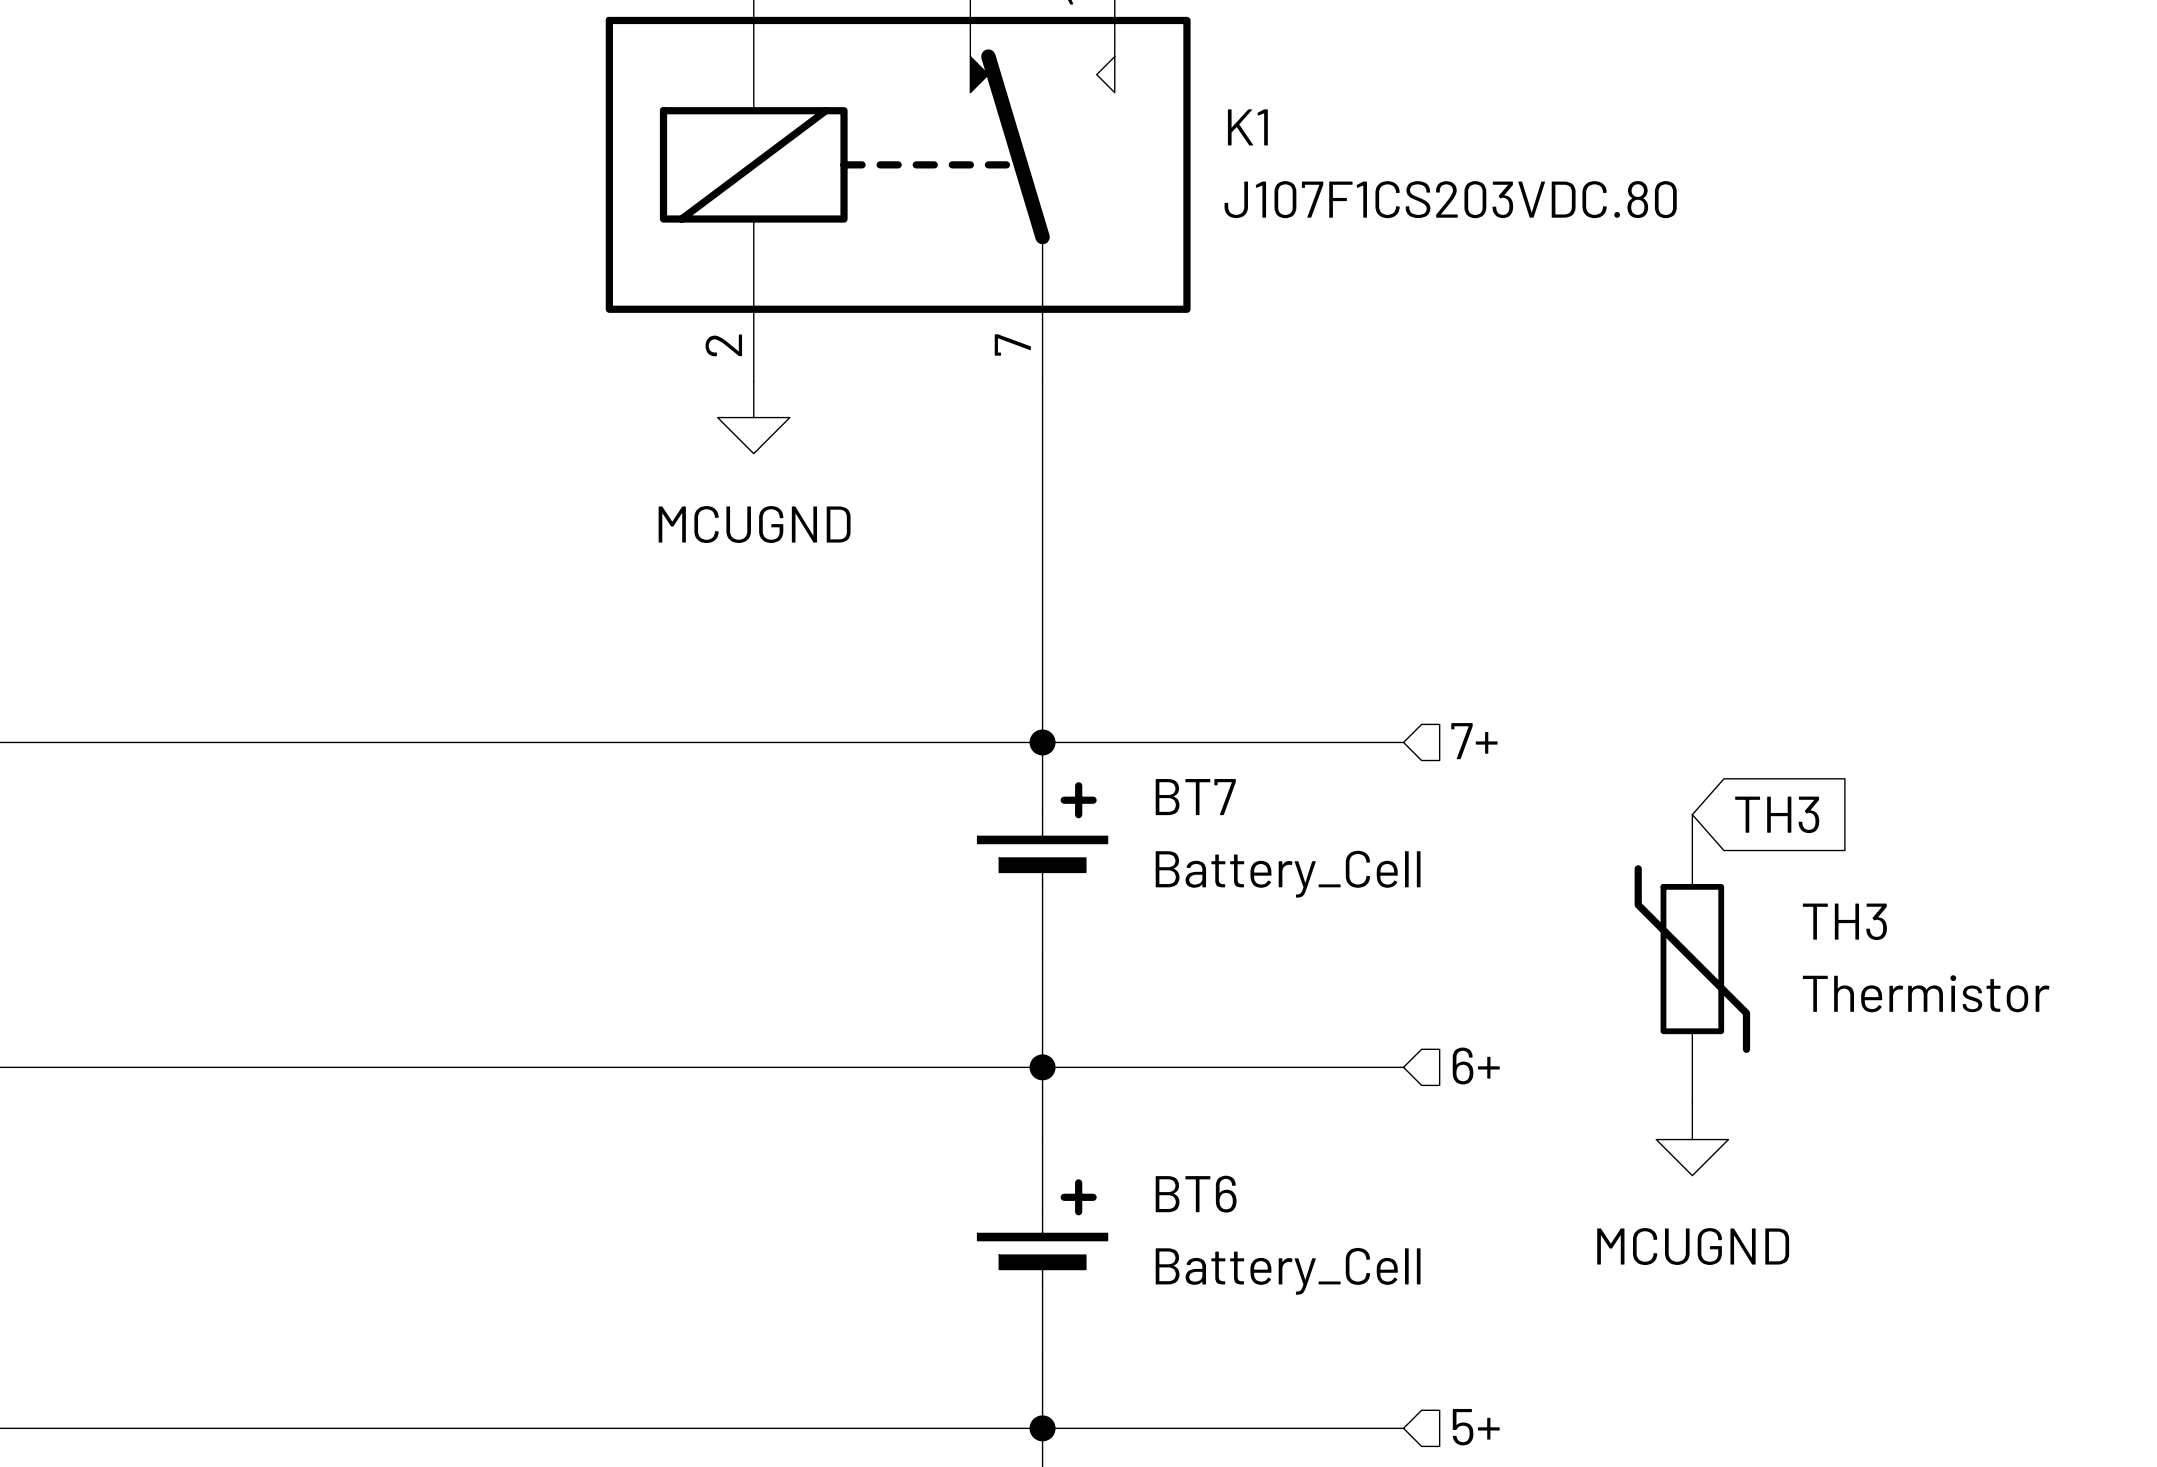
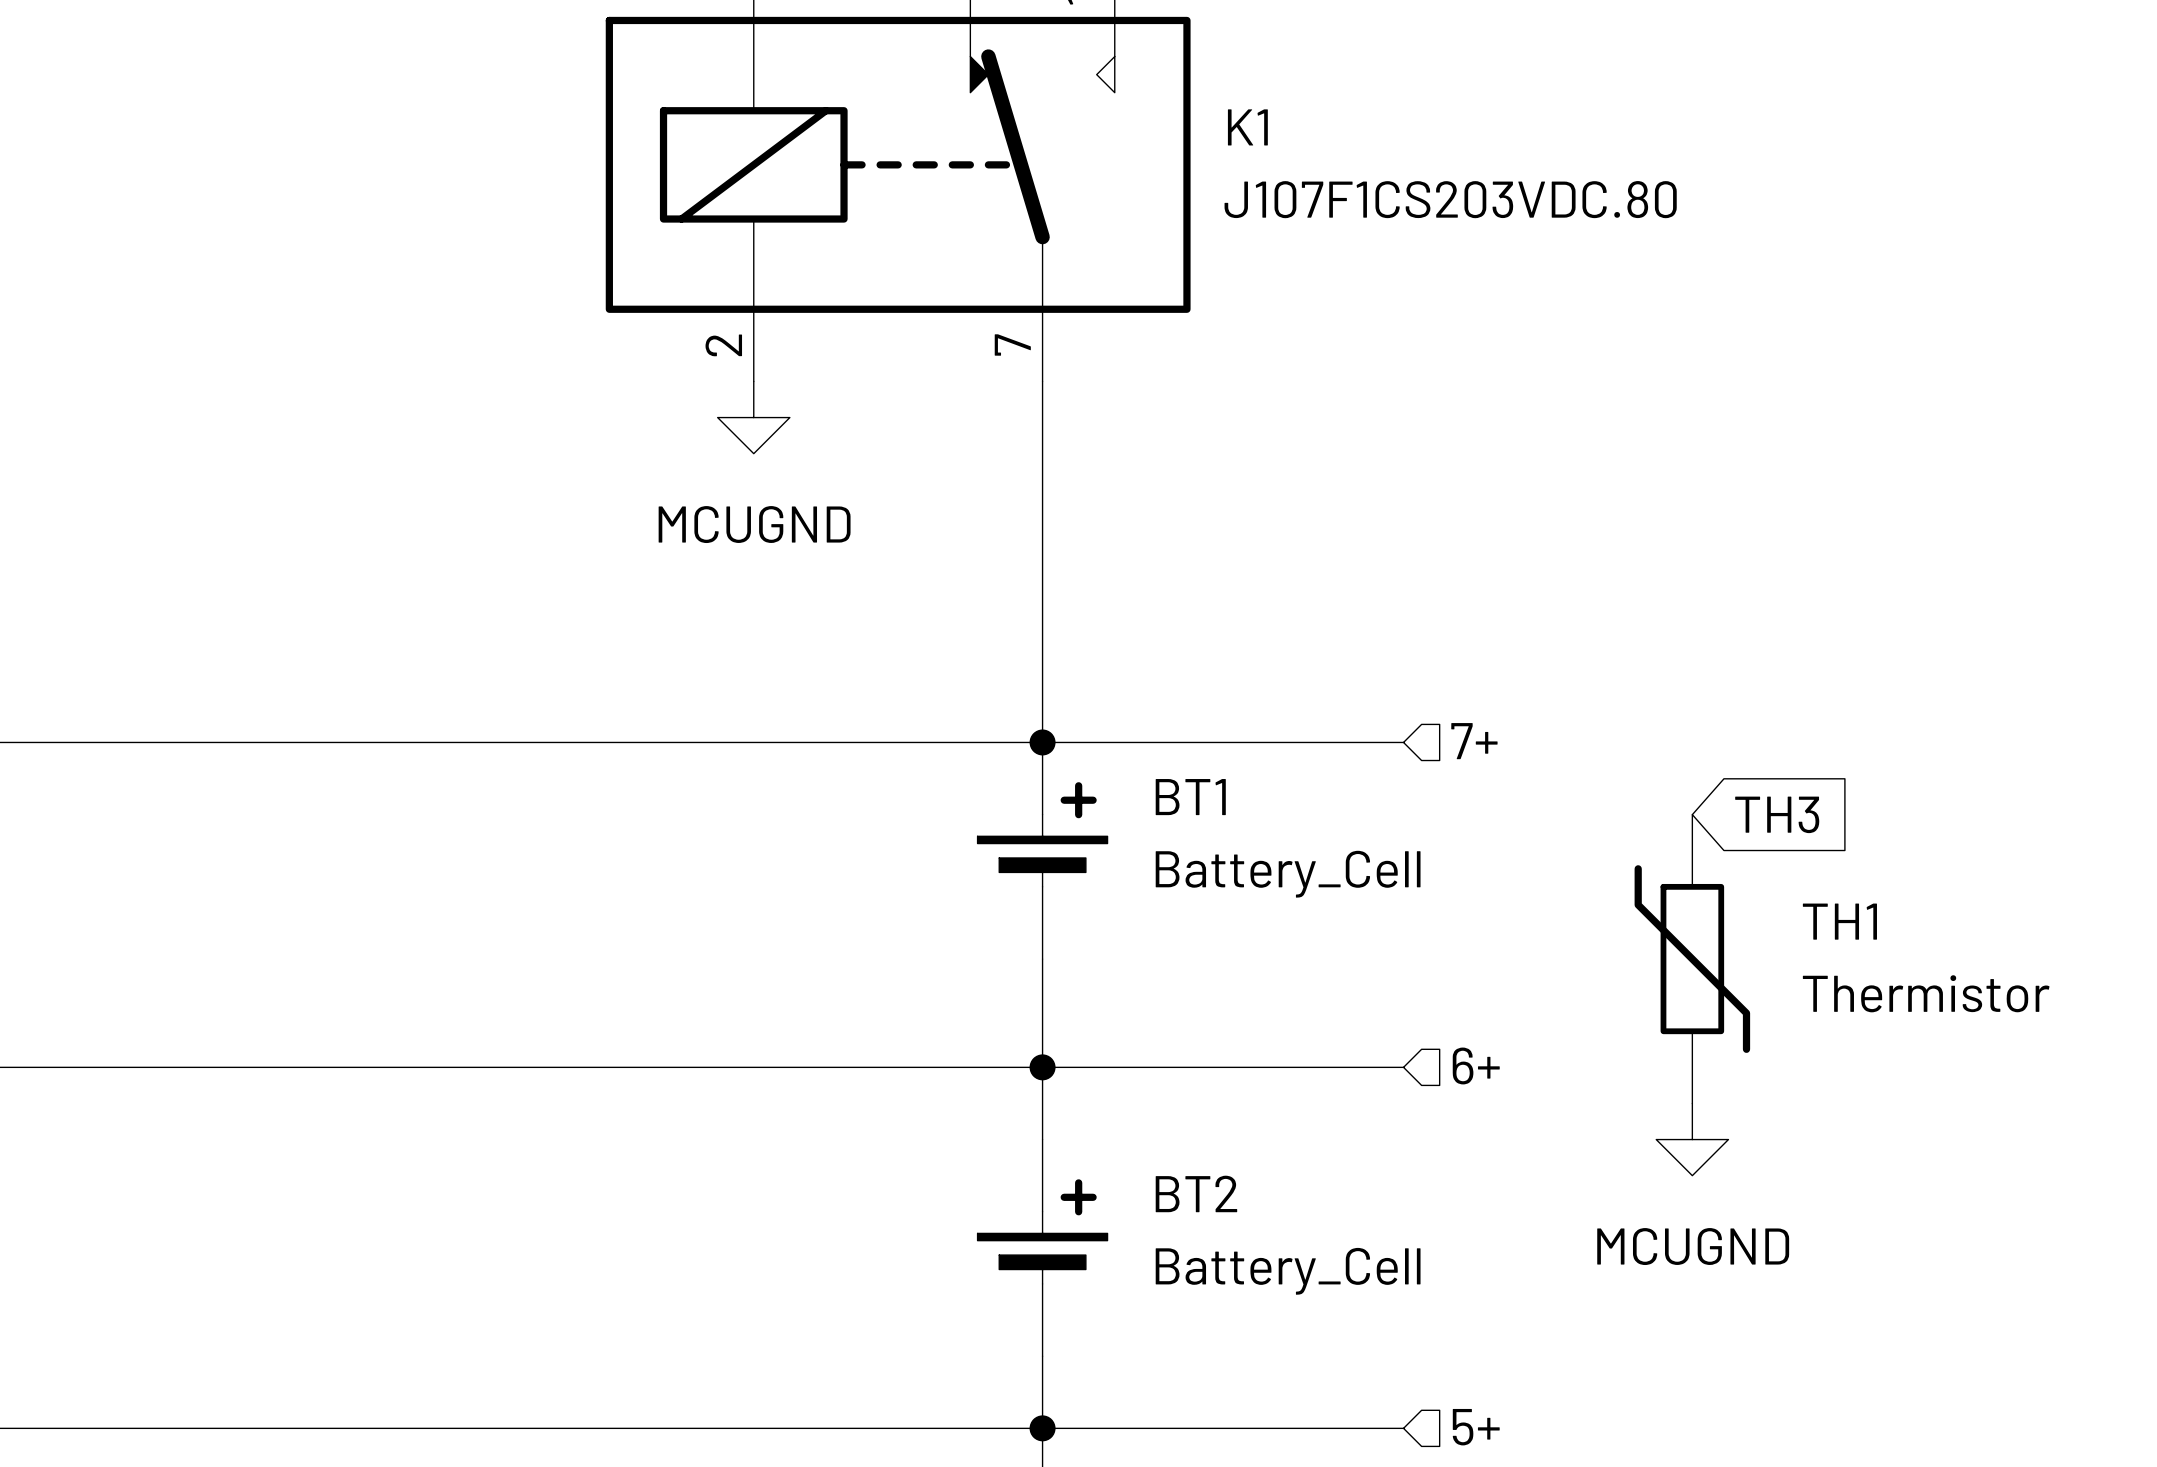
BT7 name: BT7 (1195, 797) -> BT1 (1190, 797)
TH3 name: TH3 (1844, 921) -> TH1 (1839, 921)
BT6 name: BT6 (1196, 1194) -> BT2 (1196, 1193)

